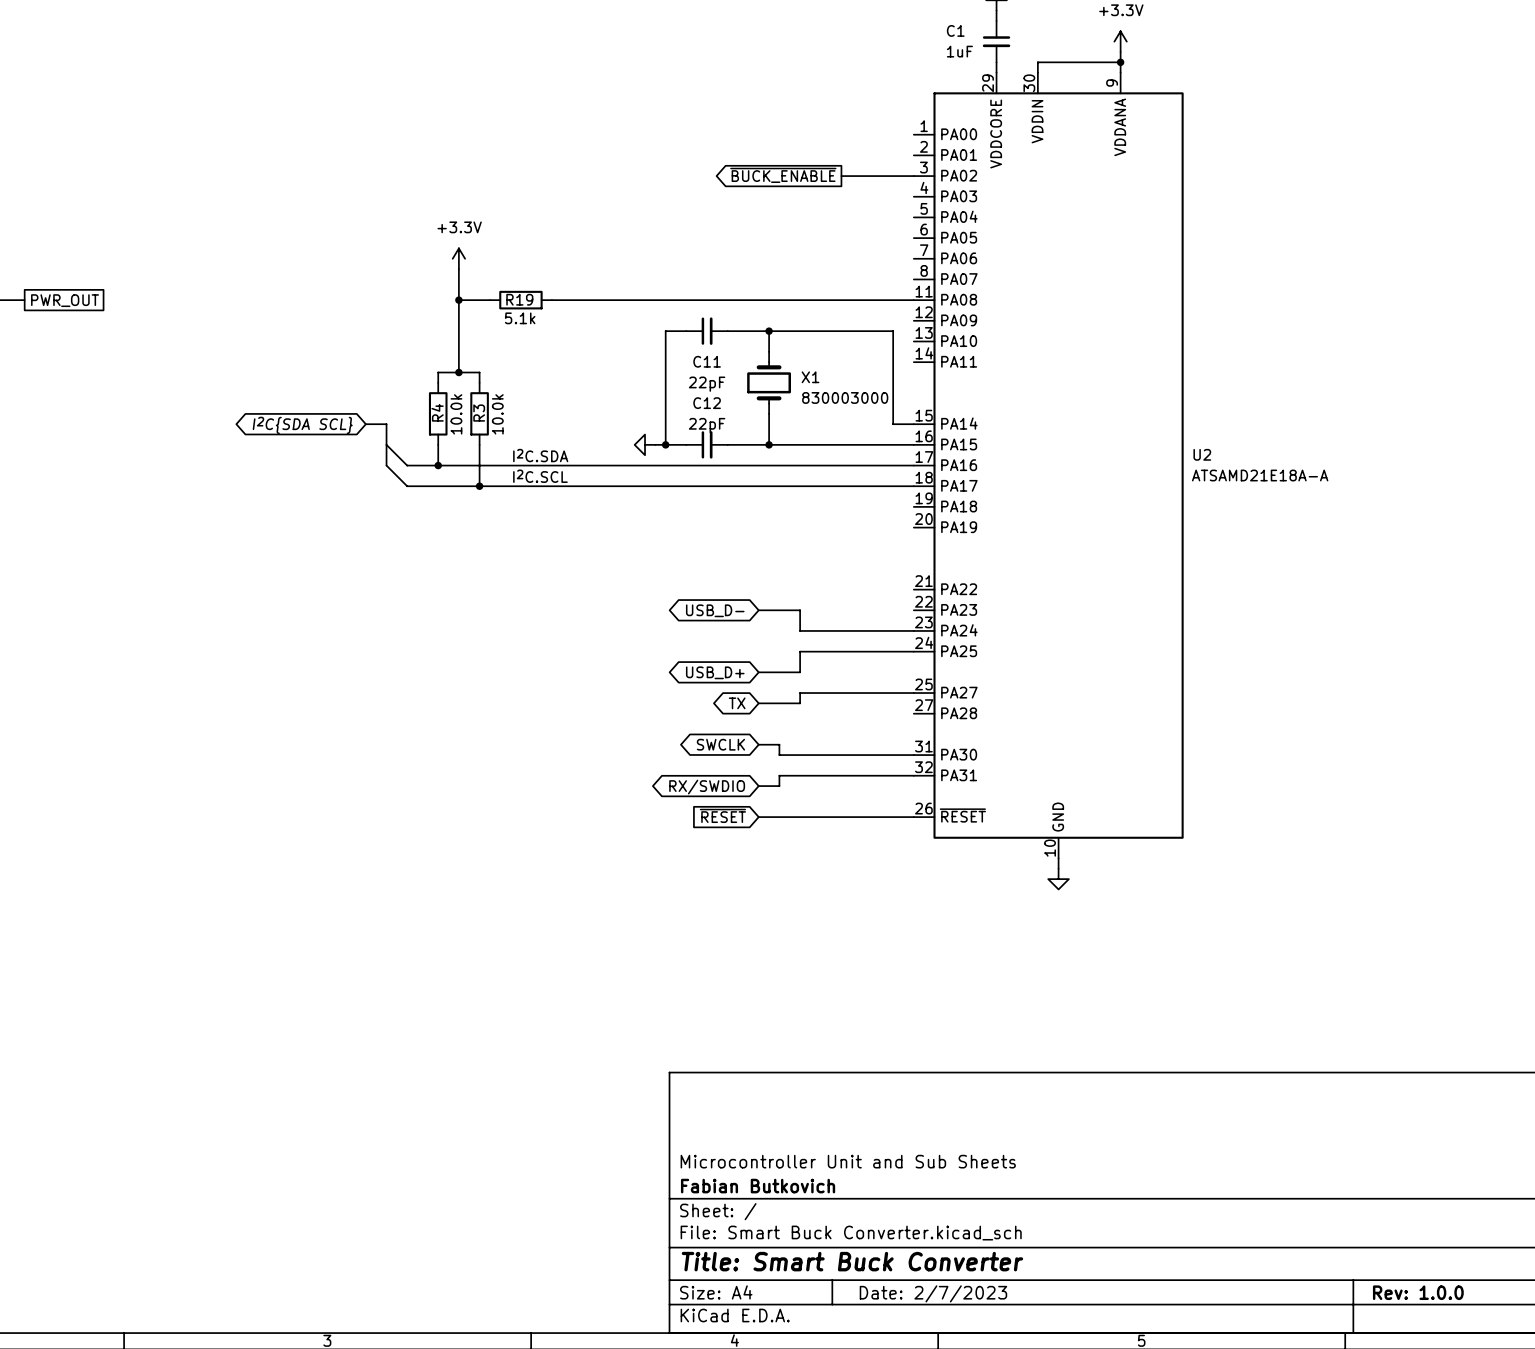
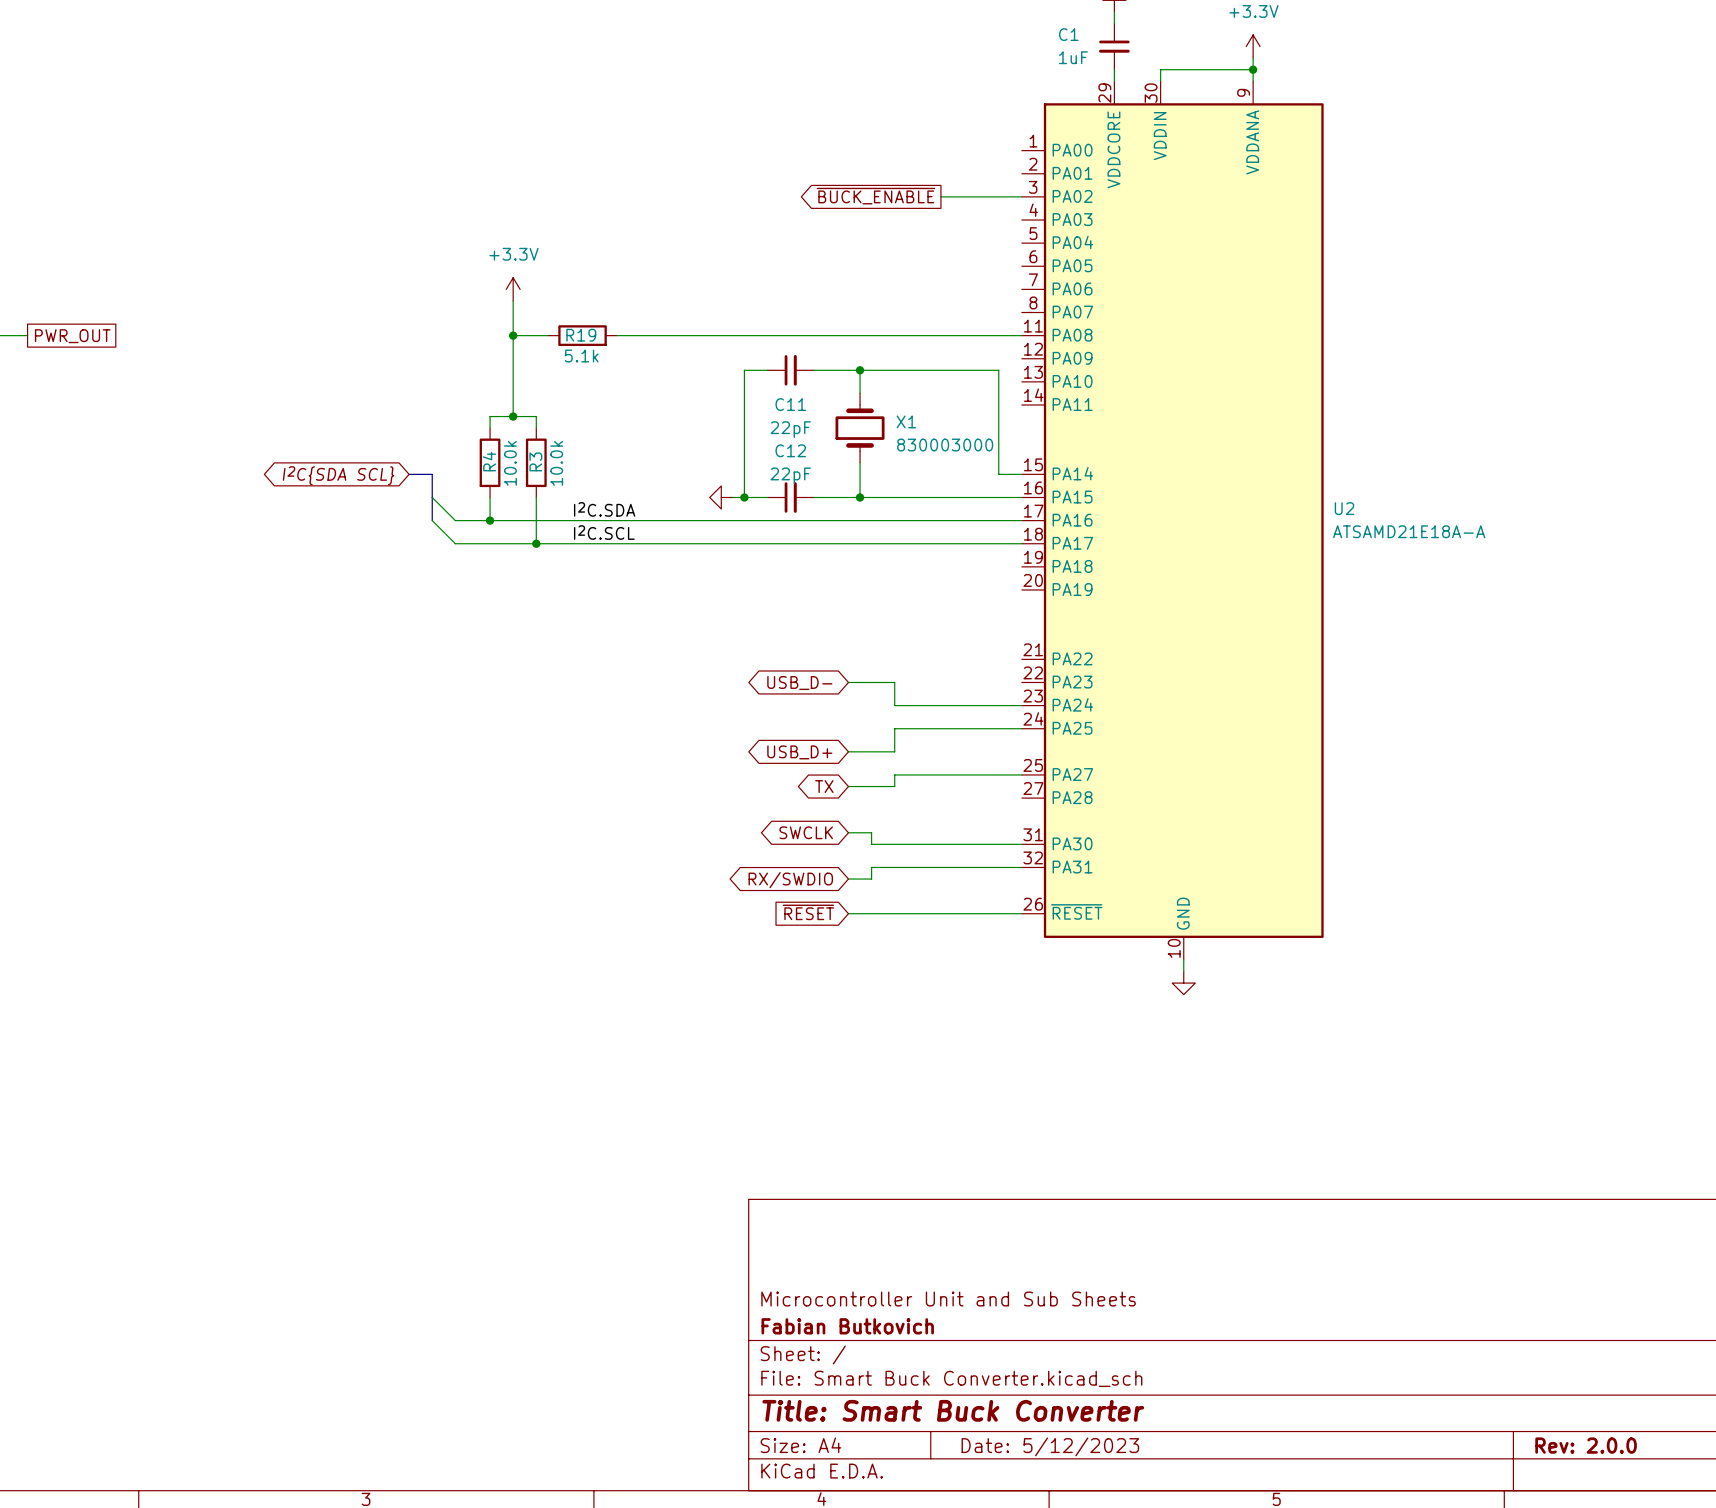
title block: Rev: 1.0.0 (1418, 1292) -> Rev: 2.0.0 (1586, 1445)
title block: Date: 2/7/2023 (933, 1293) -> Date: 5/12/2023 (1050, 1446)

